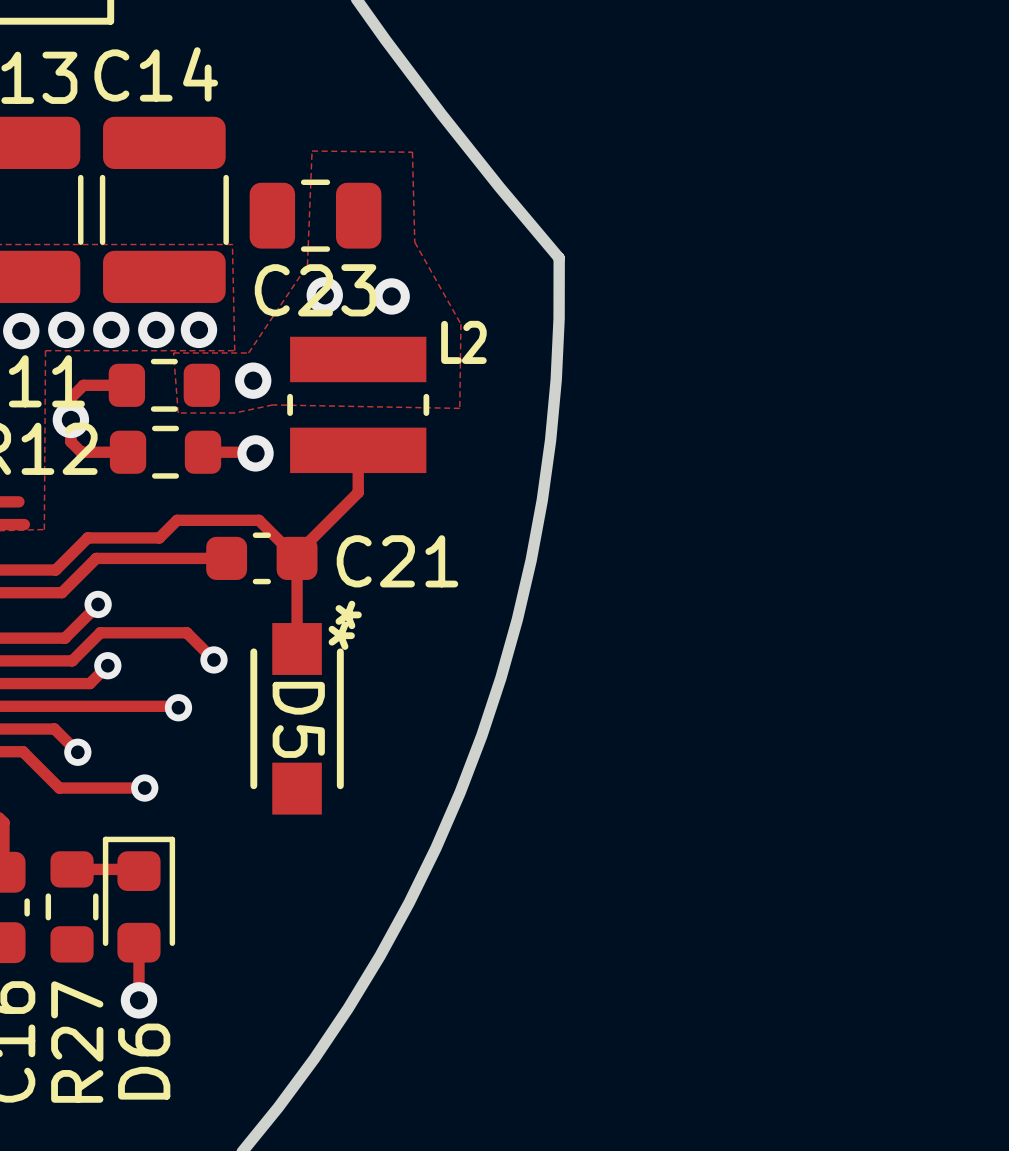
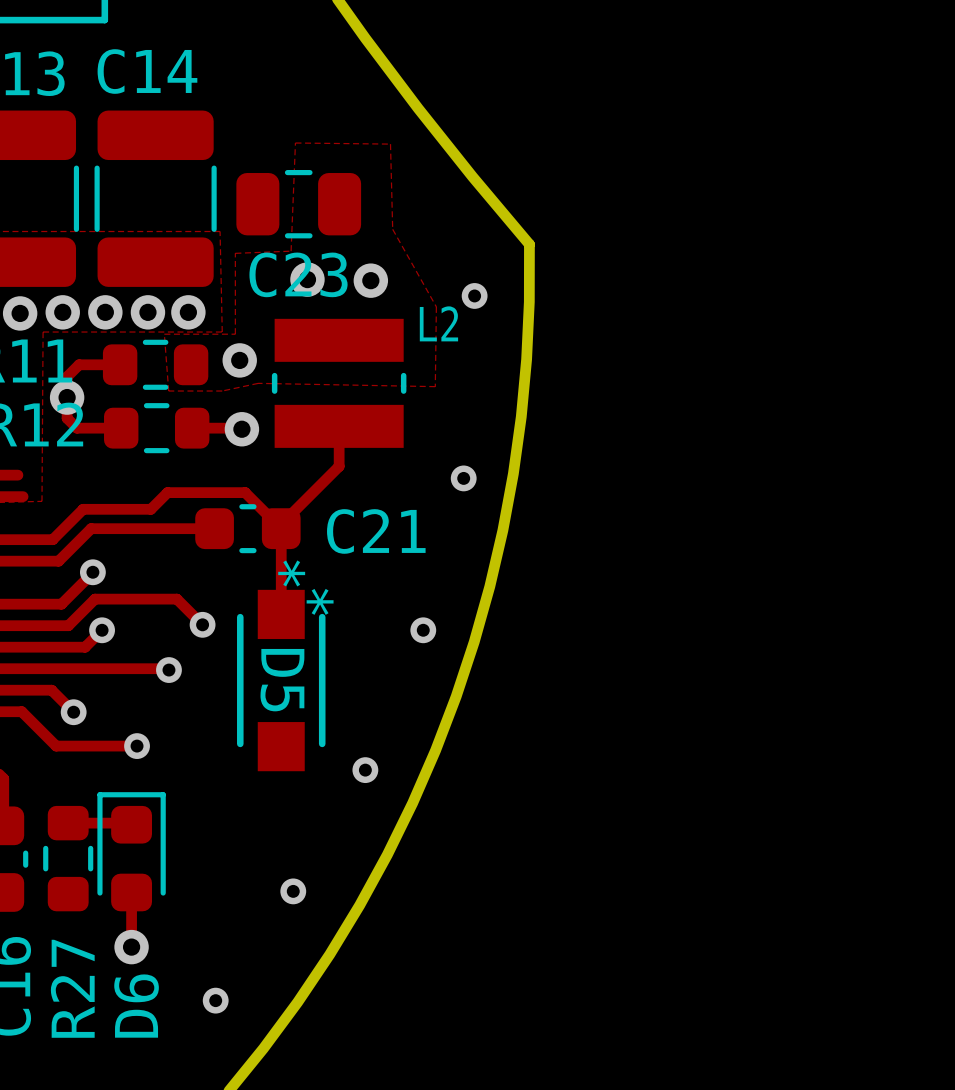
zone outline: (307, 265) (248, 352) -> (291, 251) (235, 253) (235, 334)
via: none -> (474, 295)
via: none -> (463, 478)
D5 text position: * (348, 614) -> * (291, 573)
via: none -> (423, 630)
via: none -> (365, 770)
via: none -> (293, 891)
via: none -> (215, 1000)

